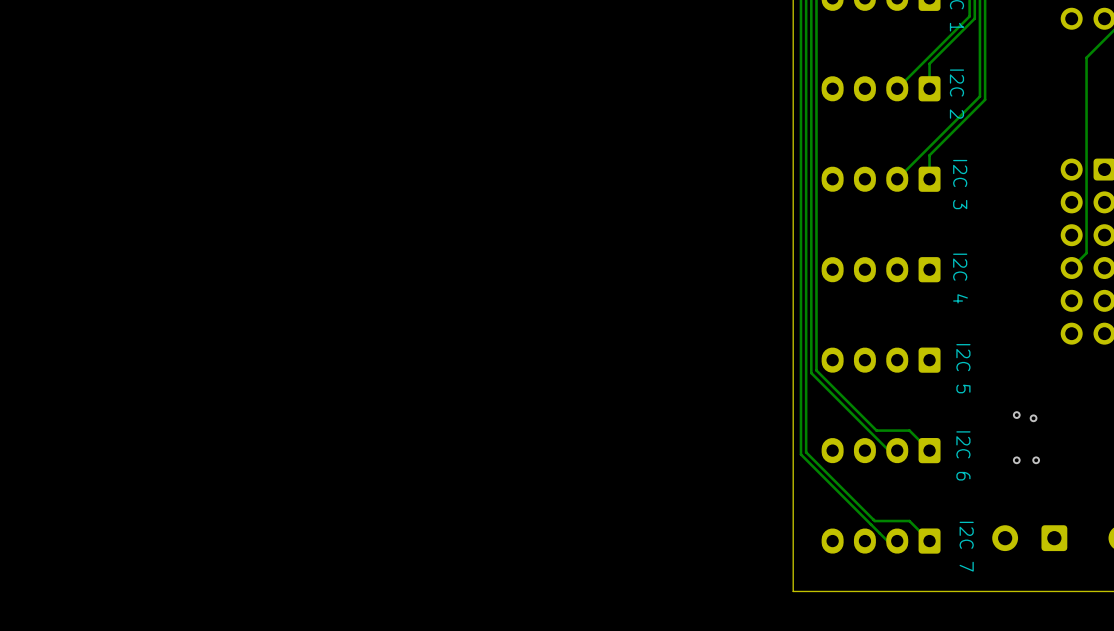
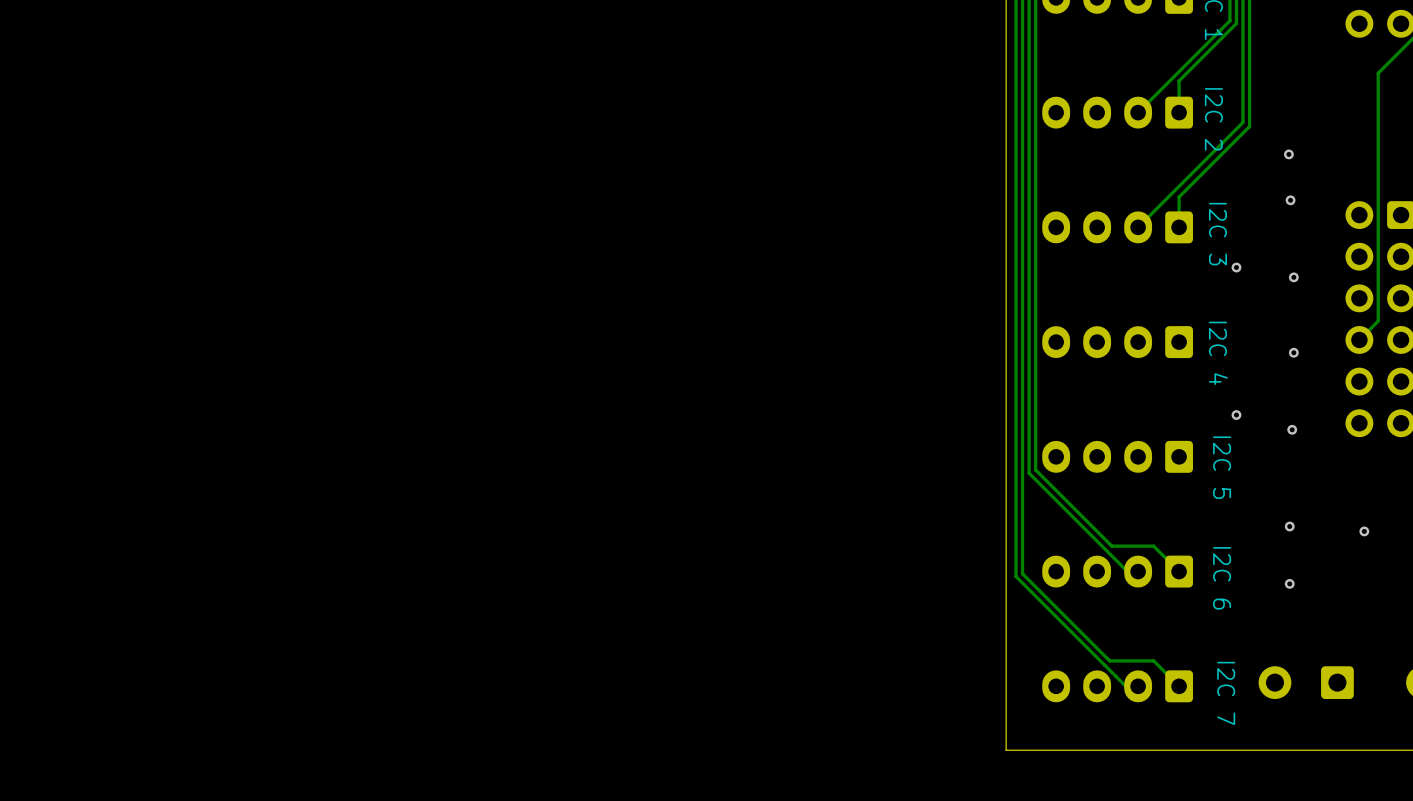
via: none -> (1288, 154)
via: none -> (1290, 200)
via: none -> (1236, 267)
via: none -> (1293, 277)
via: none -> (1293, 352)
via: none -> (1236, 415)
via: none -> (1292, 429)
via: (1033, 418) -> none
via: none -> (1364, 531)
via: (1036, 460) -> none

